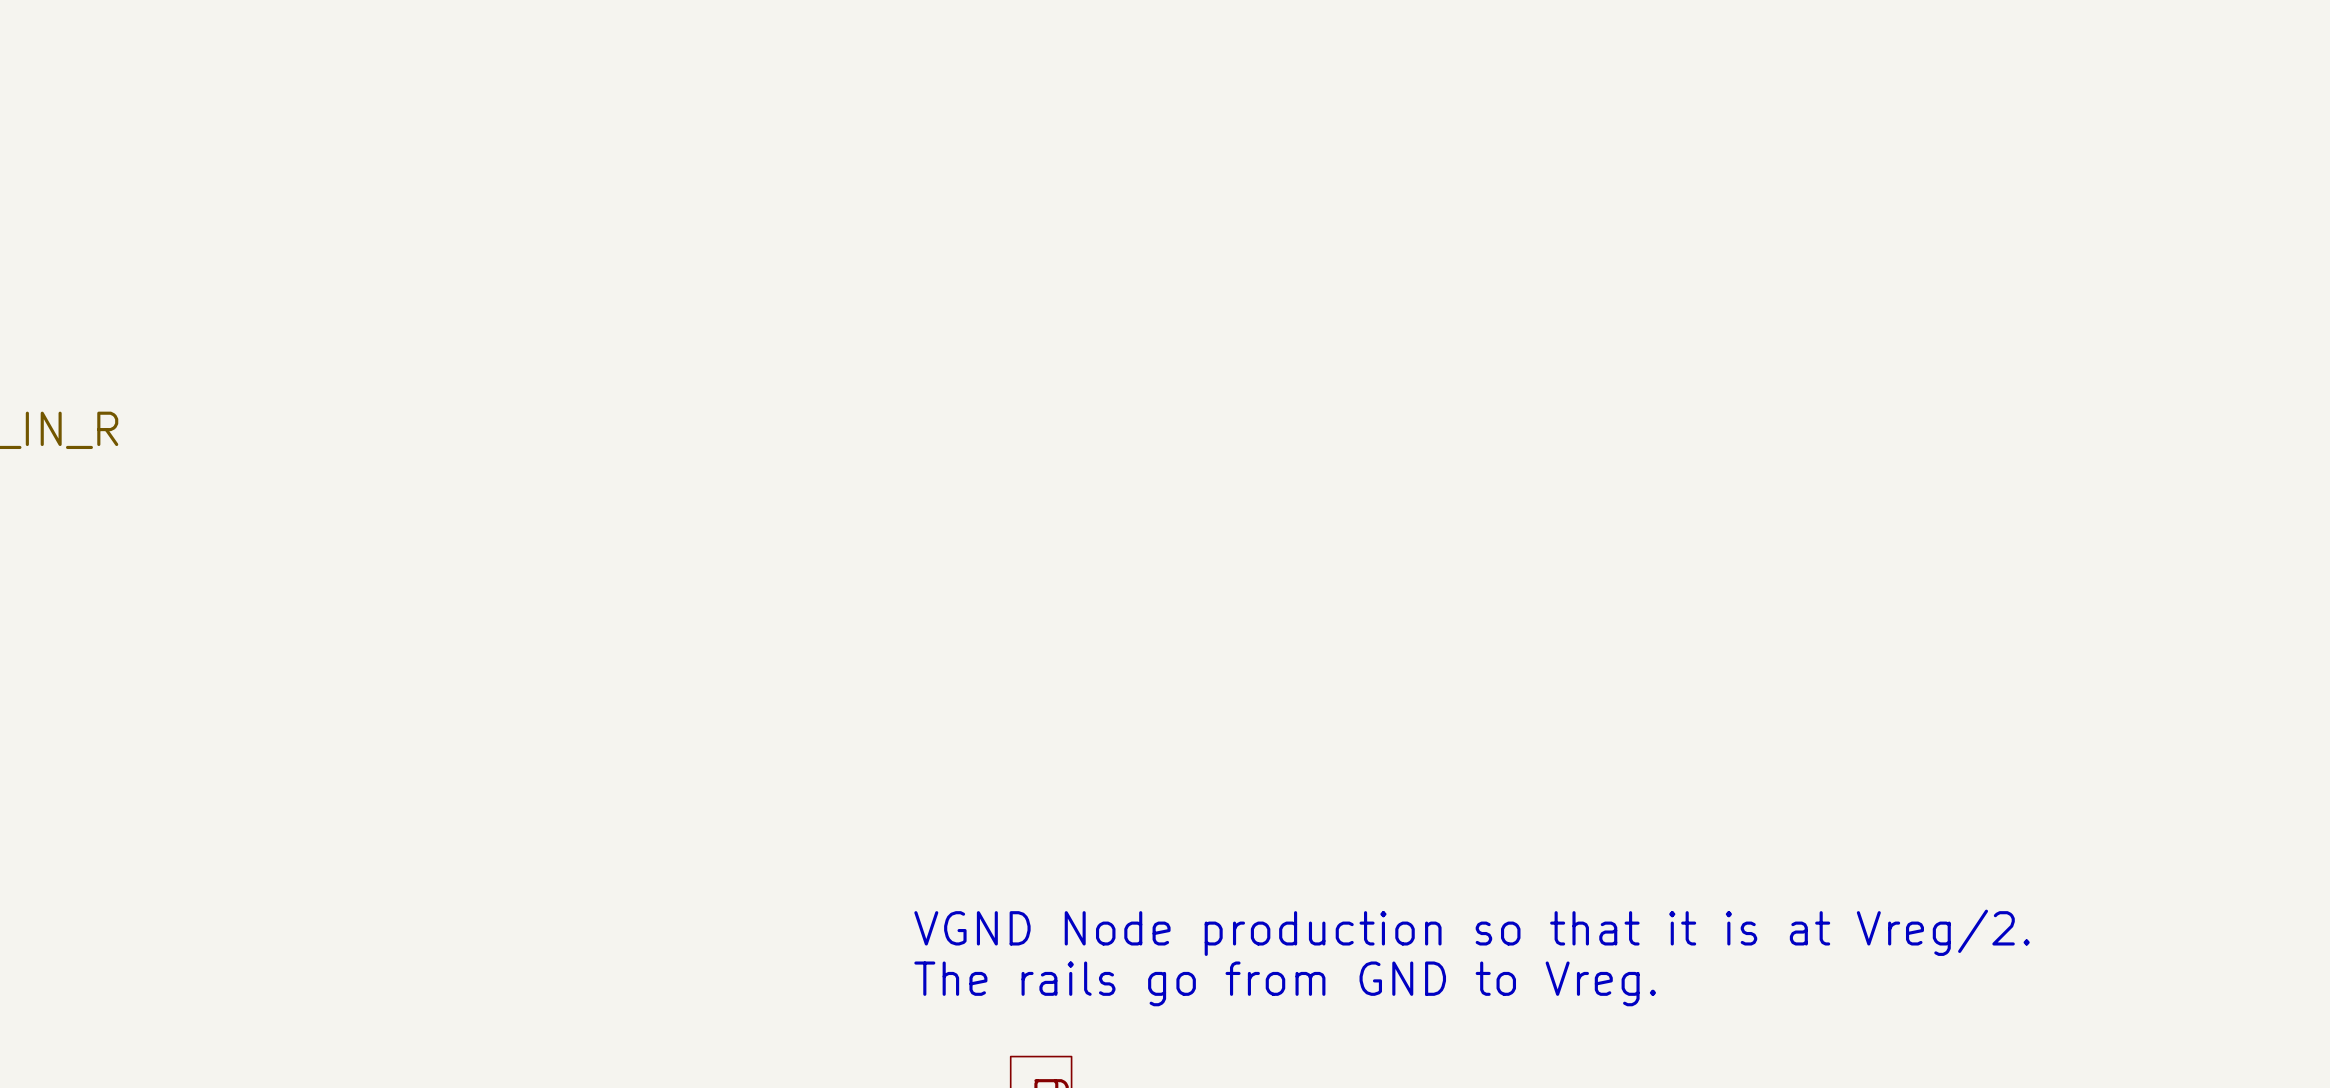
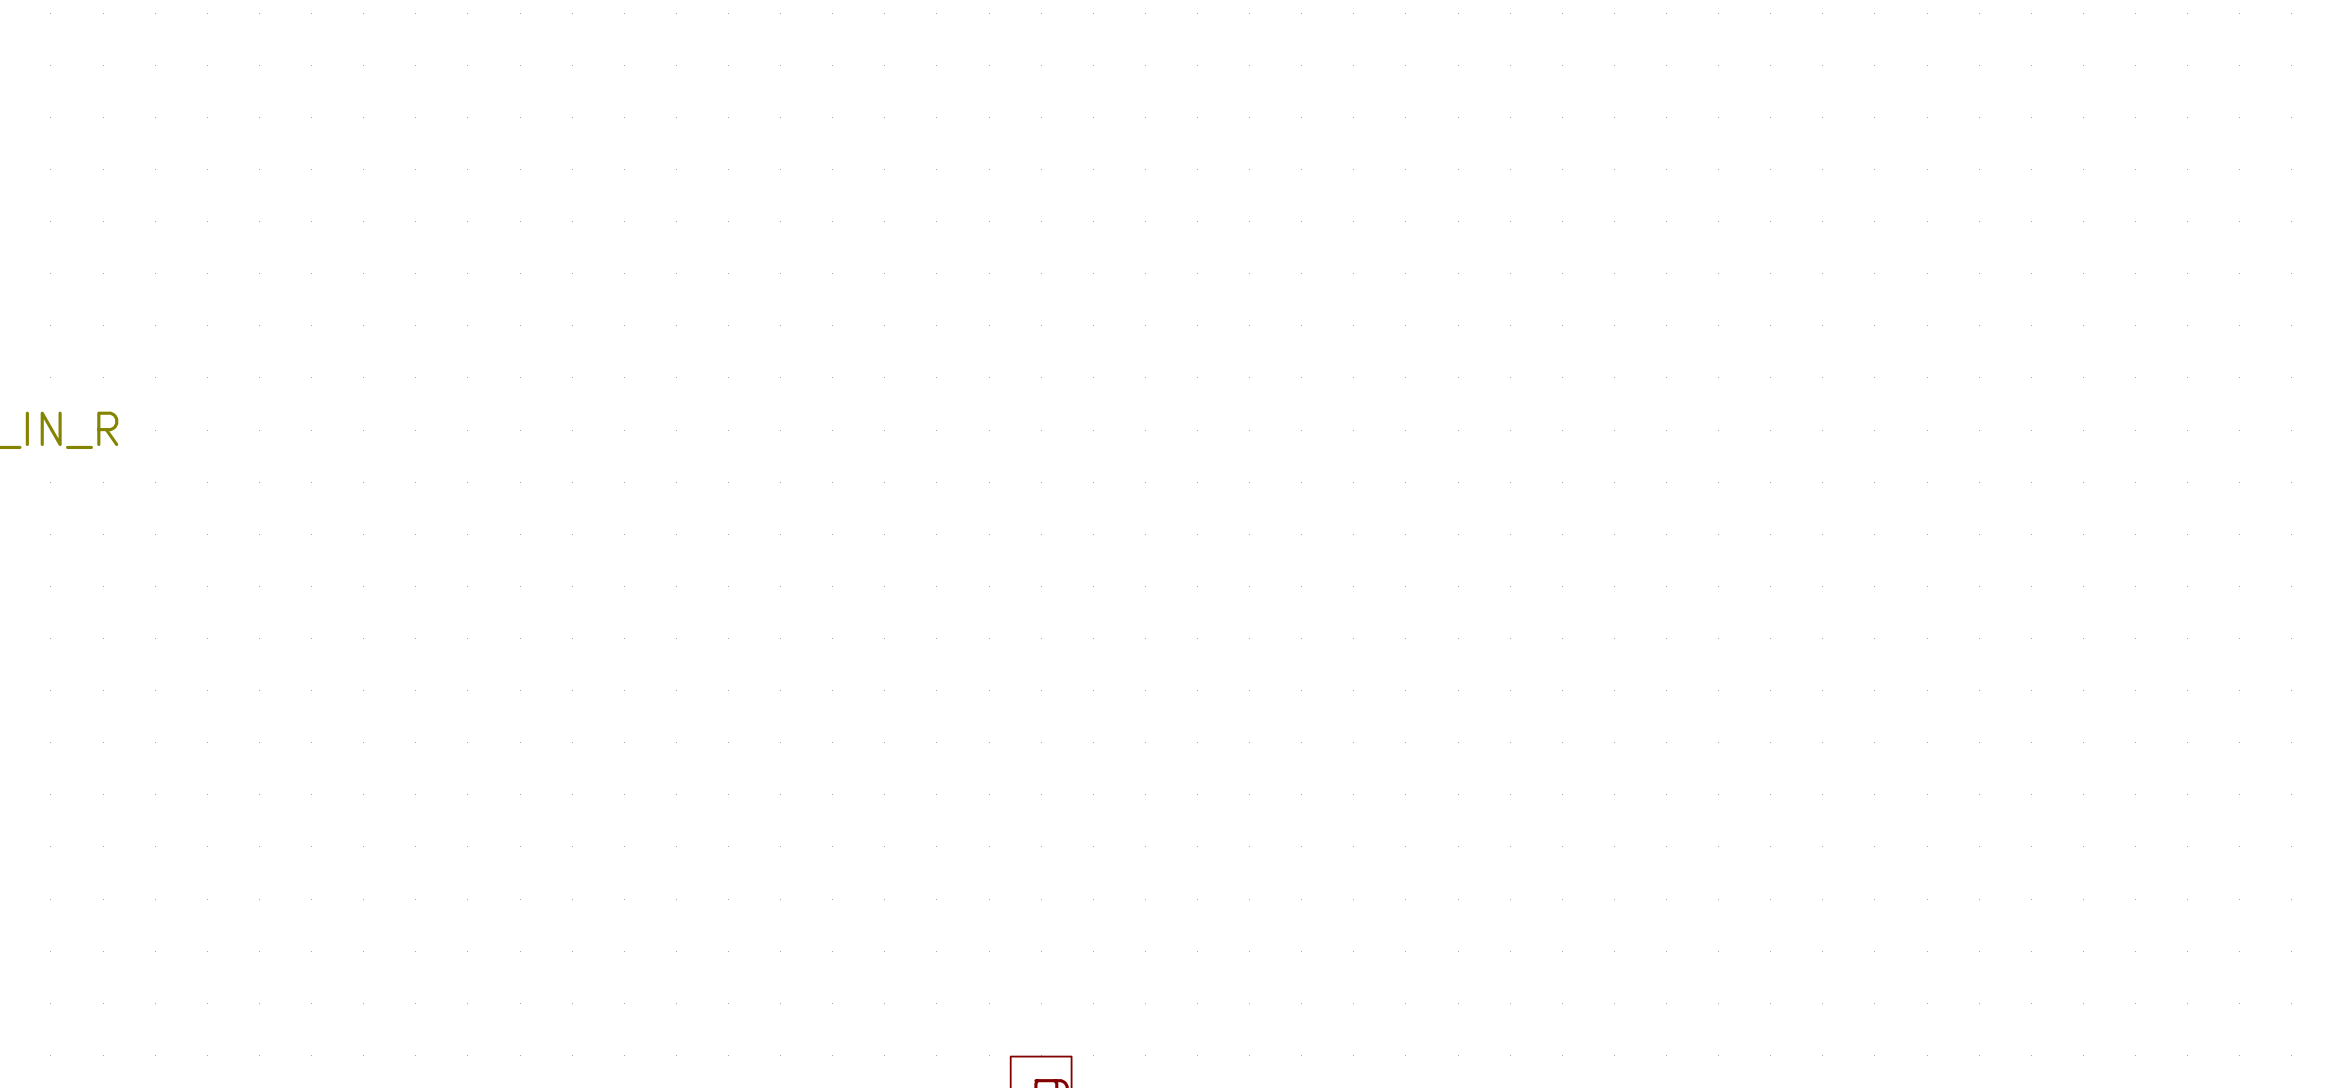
text: VGND Node production so that it is at Vreg/2. (1472, 932) -> none
text: The rails go from GND to Vreg. (1285, 983) -> none

